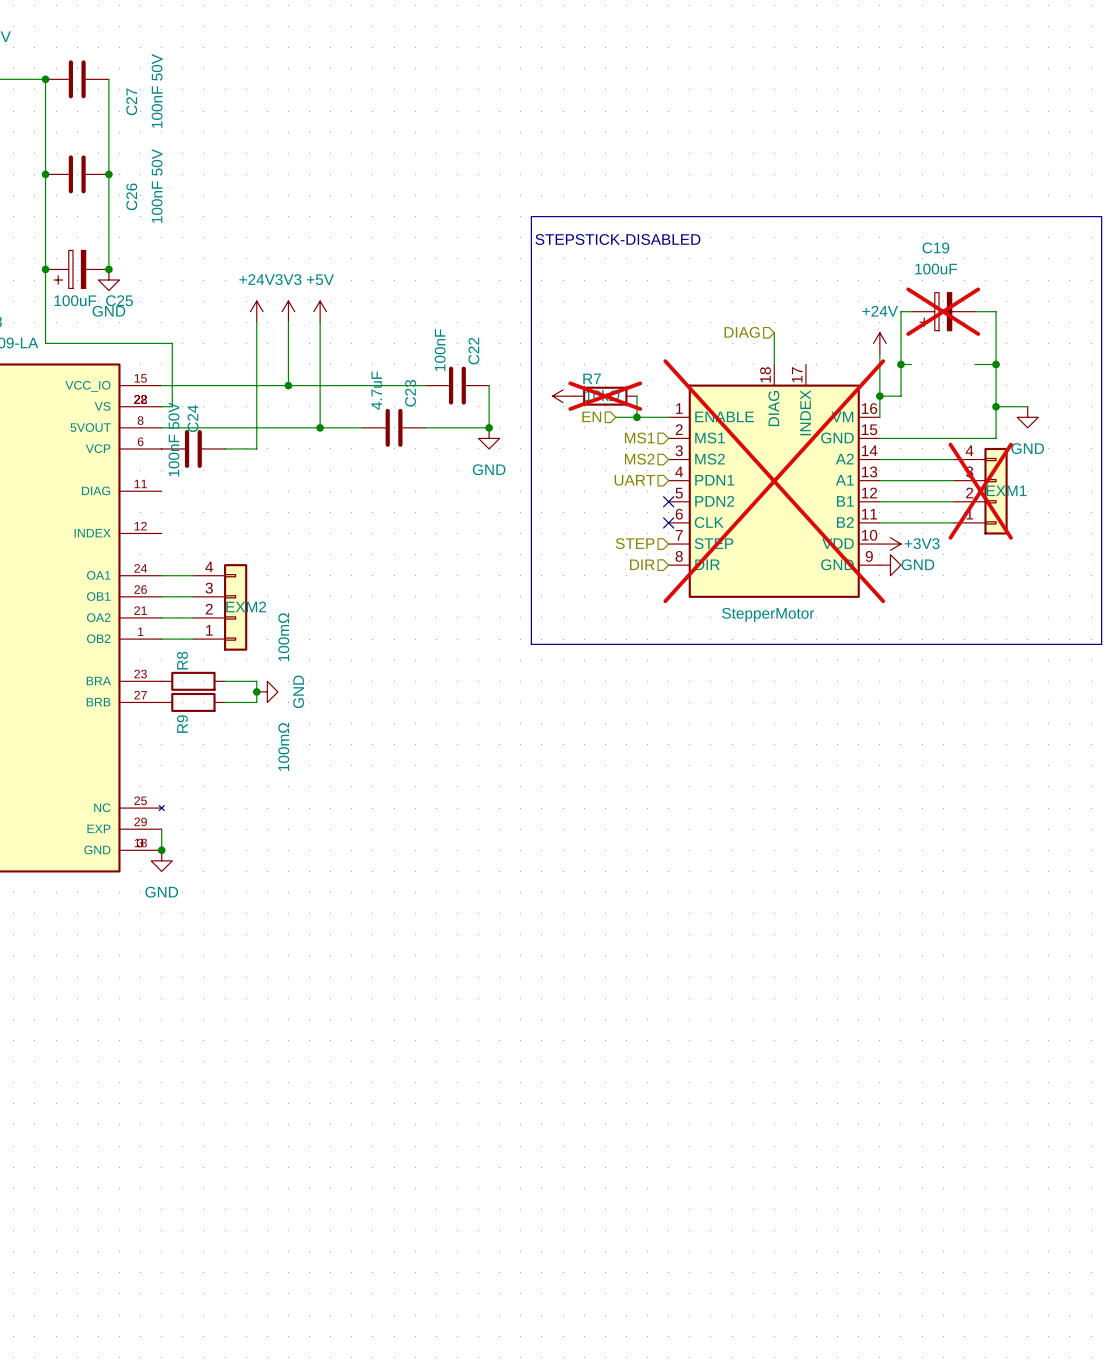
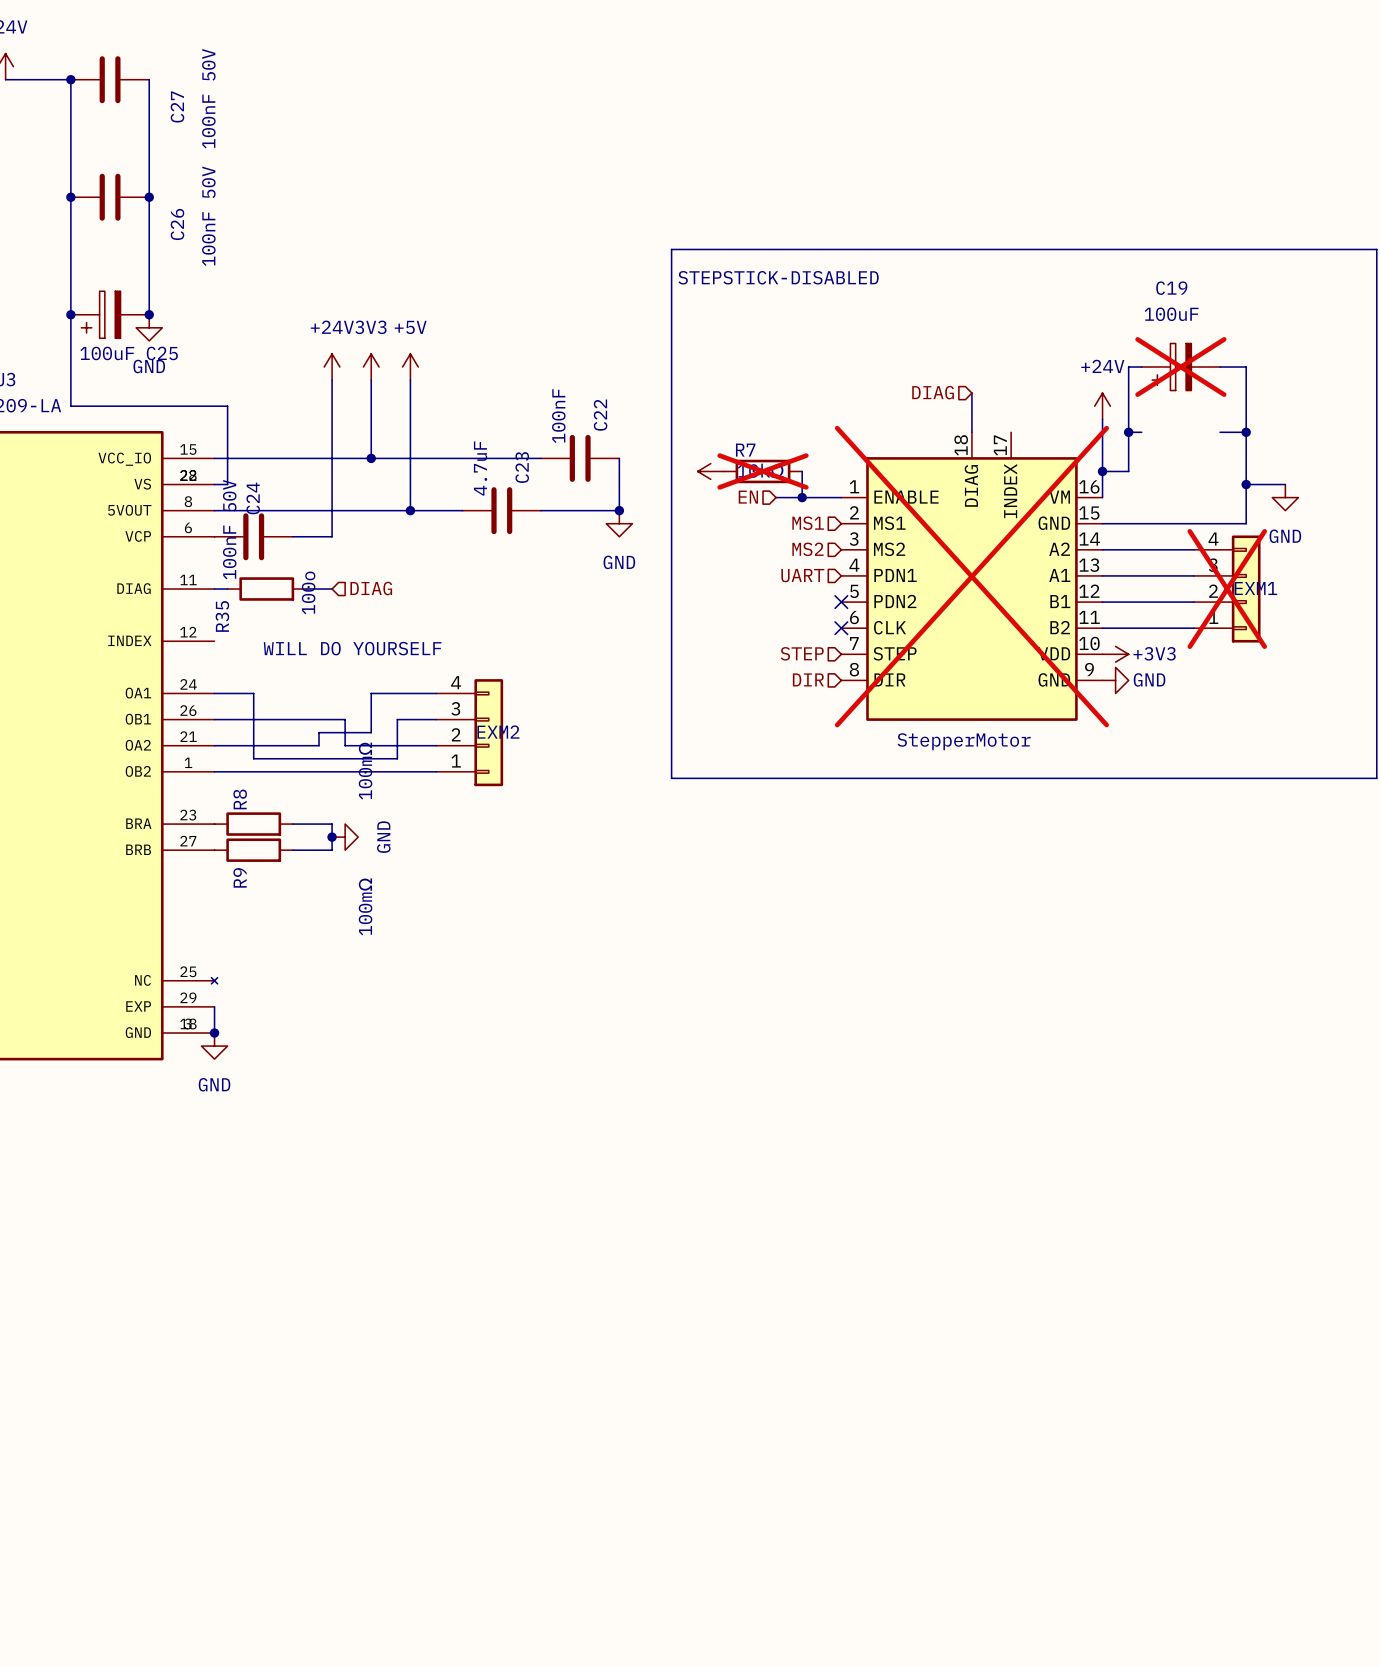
hierarchical label: none -> DIAG (371, 588)
wire: none -> (214, 589) (227, 589)
R35: none -> 100o (266, 589)
wire: none -> (305, 589) (332, 589)
text: none -> WILL DO YOURSELF (352, 648)
wire: none -> (253, 693) (253, 758) (397, 758) (397, 719) (436, 719)
wire: none -> (436, 693) (371, 693) (371, 732) (319, 732) (319, 745) (253, 745)
wire: none -> (253, 719) (345, 719) (345, 745) (436, 745)
EXM2 position: (220, 607) -> (469, 732)
wire: none -> (253, 771) (436, 771)

